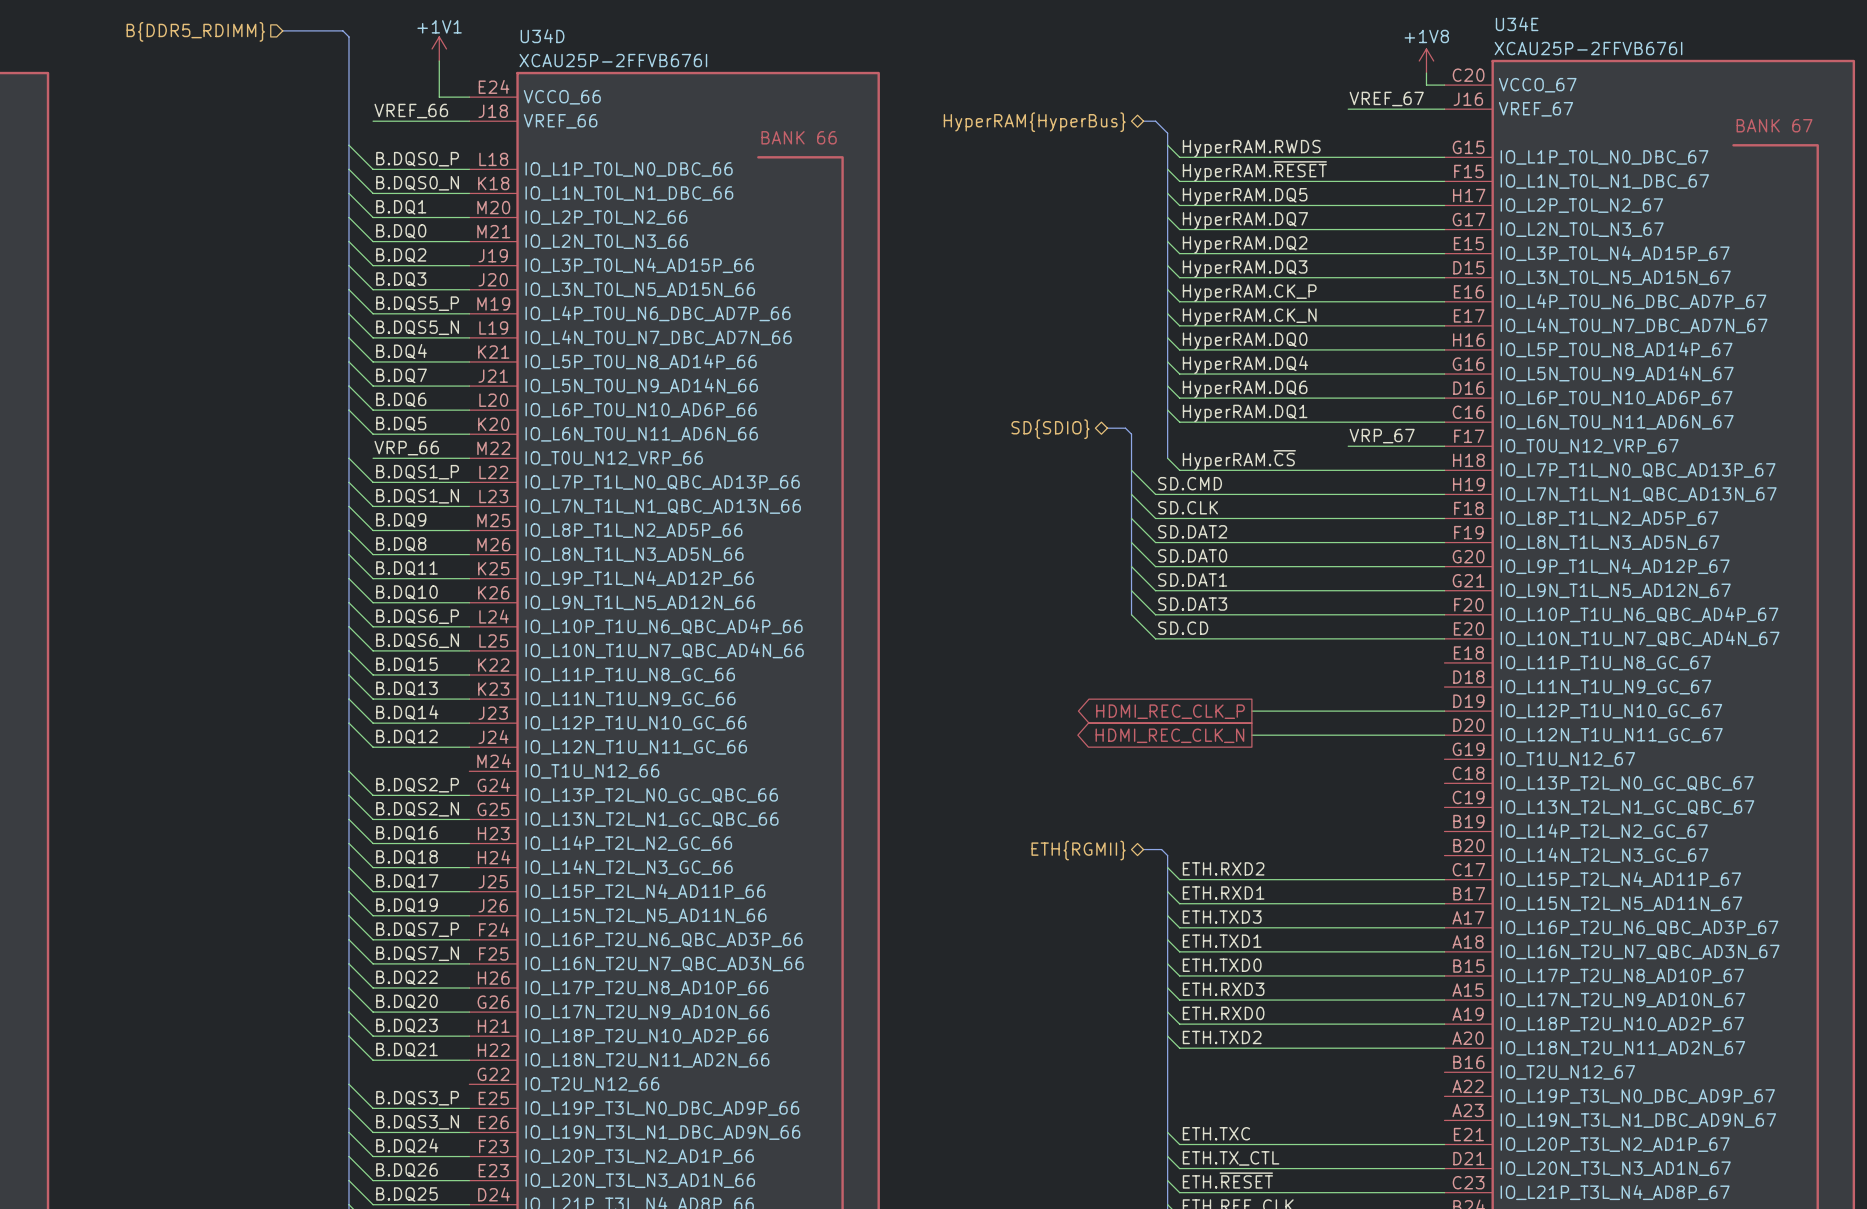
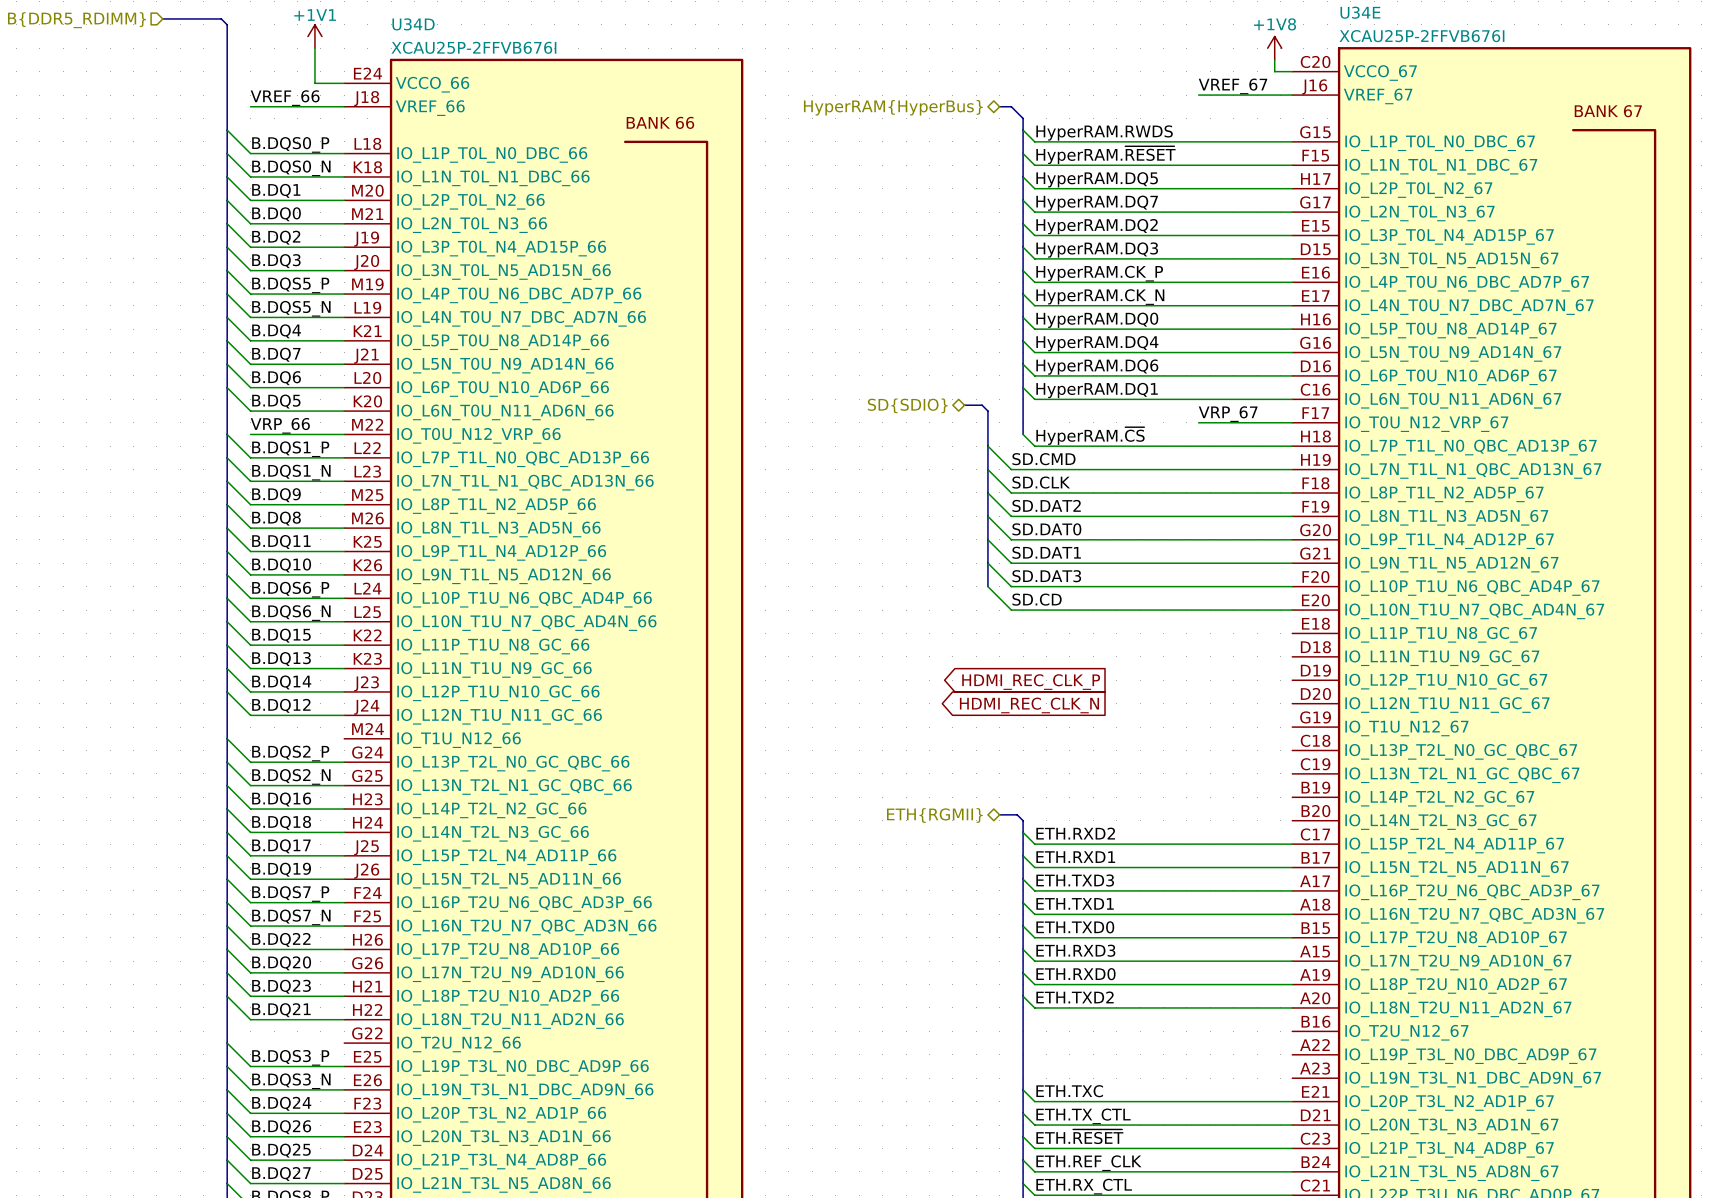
wire: (1251, 711) (1444, 711) -> none
wire: (1251, 735) (1444, 735) -> none

